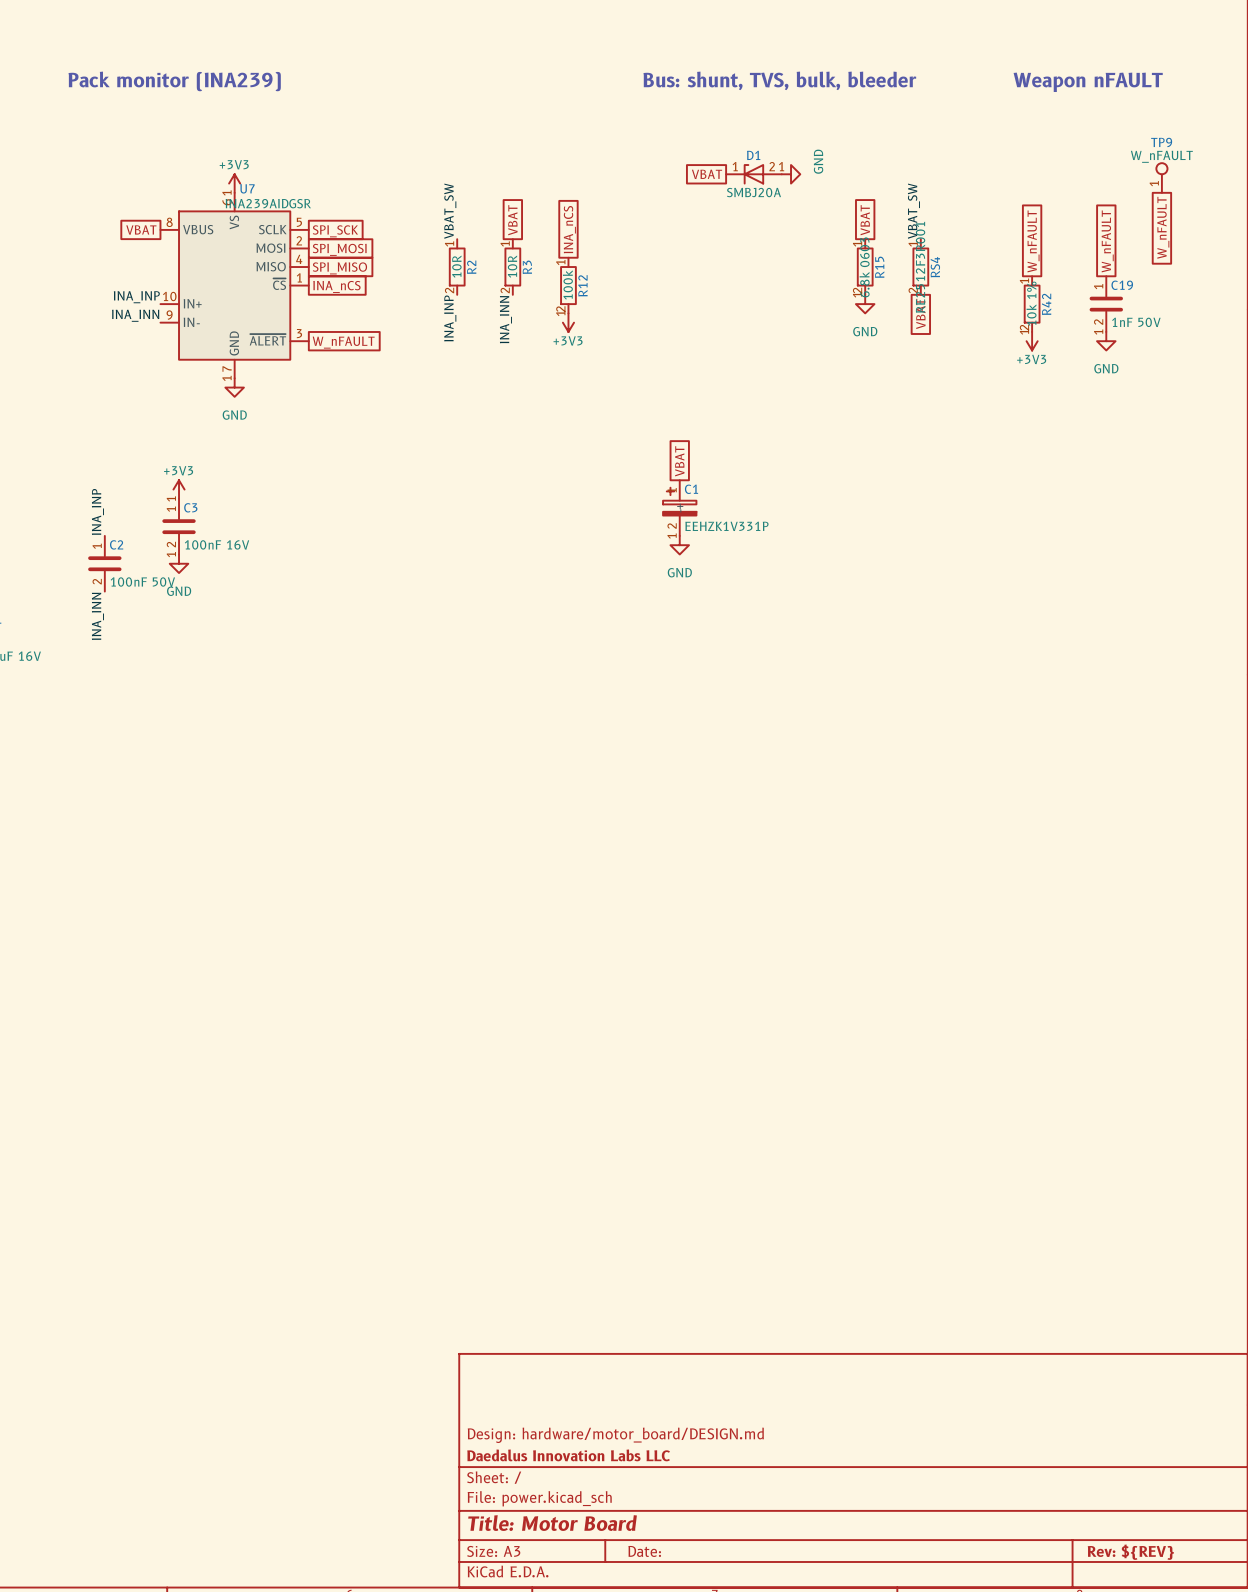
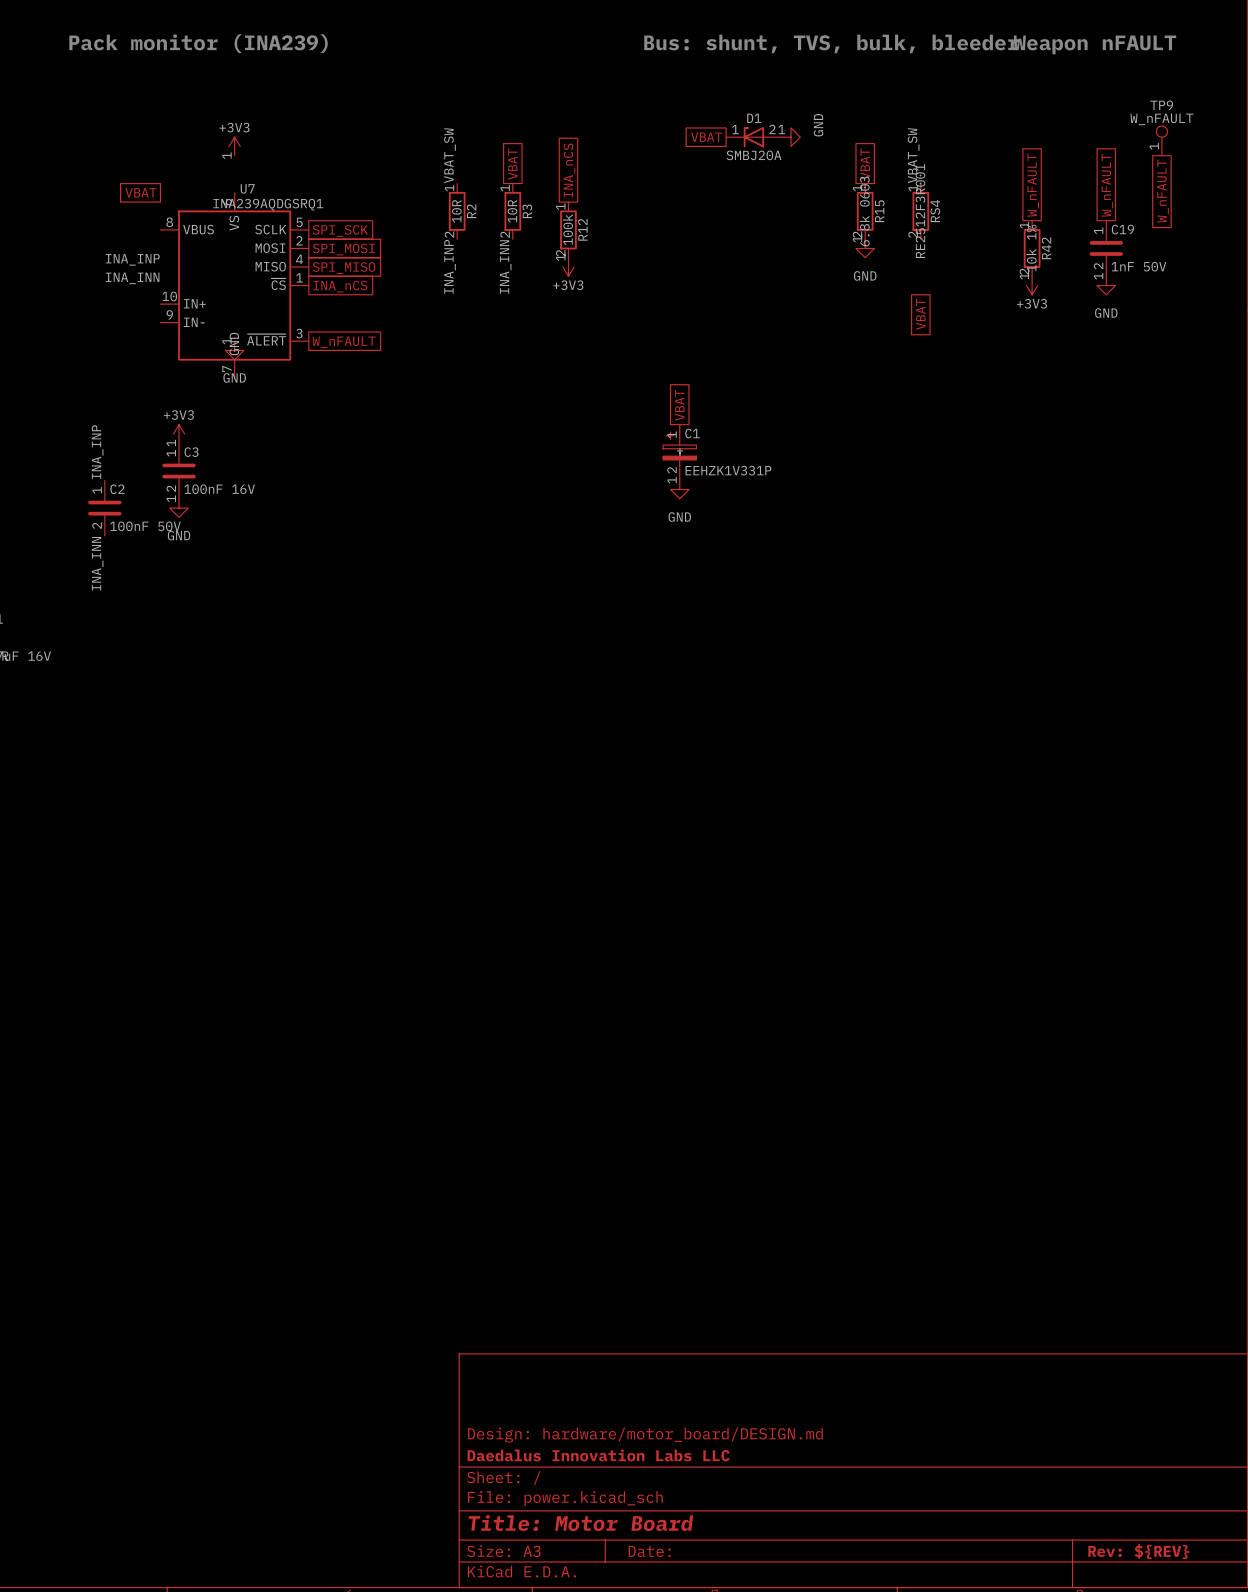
text position: Bus: shunt, TVS, bulk, bleeder (779, 80) -> Bus: shunt, TVS, bulk, bleeder (831, 43)
text position: Pack monitor (INA239) (174, 81) -> Pack monitor (INA239) (198, 43)
text position: Weapon nFAULT (1088, 82) -> Weapon nFAULT (1095, 44)
label: none -> VBAT_SW (449, 155)
global label position: VBAT (707, 174) -> VBAT (706, 137)
D1 position: (753, 174) -> (753, 137)
power symbol position: GND (791, 174) -> GND (791, 137)
TP9 position: (1161, 177) -> (1161, 140)
power symbol position: +3V3 (234, 183) -> +3V3 (234, 146)
U7 value: INA239AIDGSR (268, 203) -> INA239AQDGSRQ1 (268, 204)
label: VBAT_SW (450, 211) -> INA_INP (450, 266)
label position: VBAT_SW (913, 211) -> VBAT_SW (913, 155)
global label position: VBAT (512, 220) -> VBAT (512, 164)
global label position: VBAT (865, 220) -> VBAT (865, 164)
global label position: W_nFAULT (1163, 227) -> W_nFAULT (1163, 191)
global label position: VBAT (141, 229) -> VBAT (141, 192)
global label position: INA_nCS (569, 229) -> INA_nCS (569, 170)
global label position: W_nFAULT (1033, 241) -> W_nFAULT (1033, 185)
global label position: W_nFAULT (1107, 241) -> W_nFAULT (1107, 185)
power symbol: none -> GND (865, 248)
R2 position: (457, 267) -> (457, 211)
R3 position: (512, 267) -> (512, 211)
R15 position: (865, 267) -> (865, 211)
RS4 position: (920, 267) -> (920, 211)
R12 position: (568, 285) -> (568, 229)
label position: INA_INP (136, 297) -> INA_INP (132, 259)
power symbol: GND (865, 304) -> none
R42 position: (1032, 304) -> (1032, 248)
C19 position: (1106, 304) -> (1106, 248)
label position: INA_INN (135, 315) -> INA_INN (132, 278)
label: INA_INP (450, 318) -> none
label position: INA_INN (505, 319) -> INA_INN (505, 267)
power symbol position: +3V3 (568, 322) -> +3V3 (568, 267)
power symbol position: +3V3 (1032, 341) -> +3V3 (1032, 285)
power symbol position: GND (1106, 341) -> GND (1106, 285)
power symbol position: GND (234, 387) -> GND (234, 350)
label: none -> INA_INP (97, 452)
global label position: VBAT (679, 461) -> VBAT (679, 405)
power symbol position: +3V3 (179, 489) -> +3V3 (179, 433)
C1 position: (679, 508) -> (679, 452)
label: INA_INP (97, 511) -> INA_INN (97, 563)
C3 position: (179, 526) -> (179, 471)
power symbol position: GND (679, 545) -> GND (679, 489)
C2 position: (104, 563) -> (104, 508)
power symbol position: GND (179, 563) -> GND (179, 508)
label: INA_INN (97, 616) -> none

